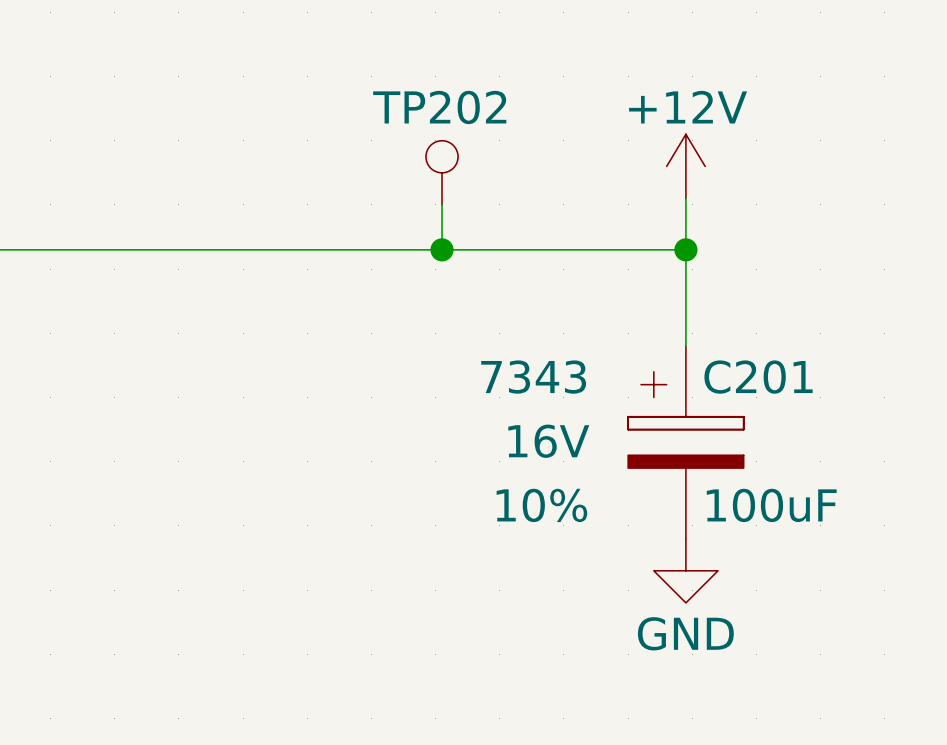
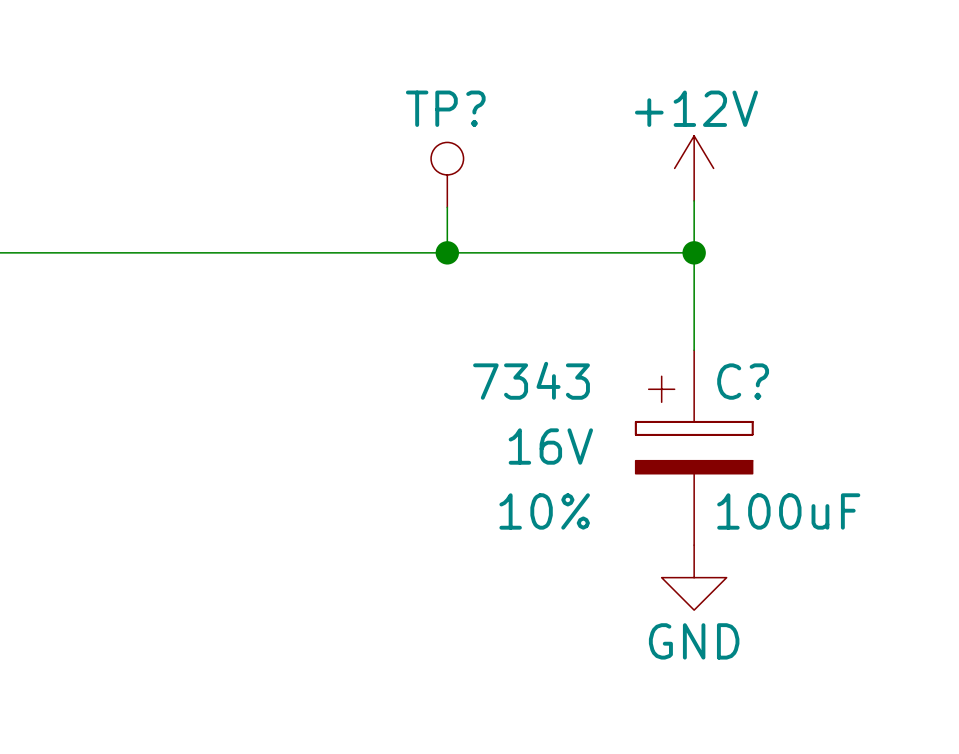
TP202 name: TP202 (439, 107) -> TP? (445, 108)
C201 name: C201 (758, 377) -> C? (743, 381)

